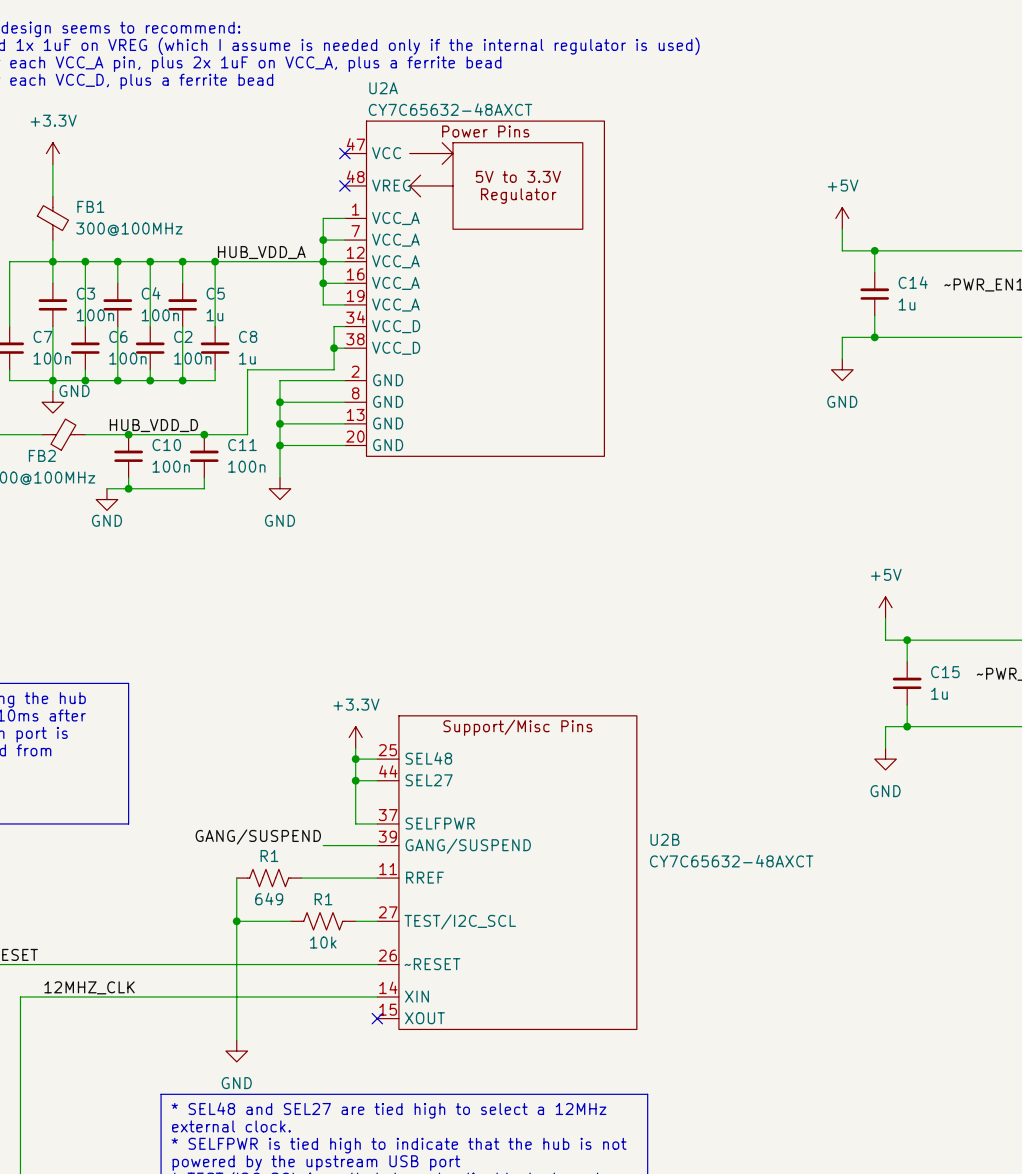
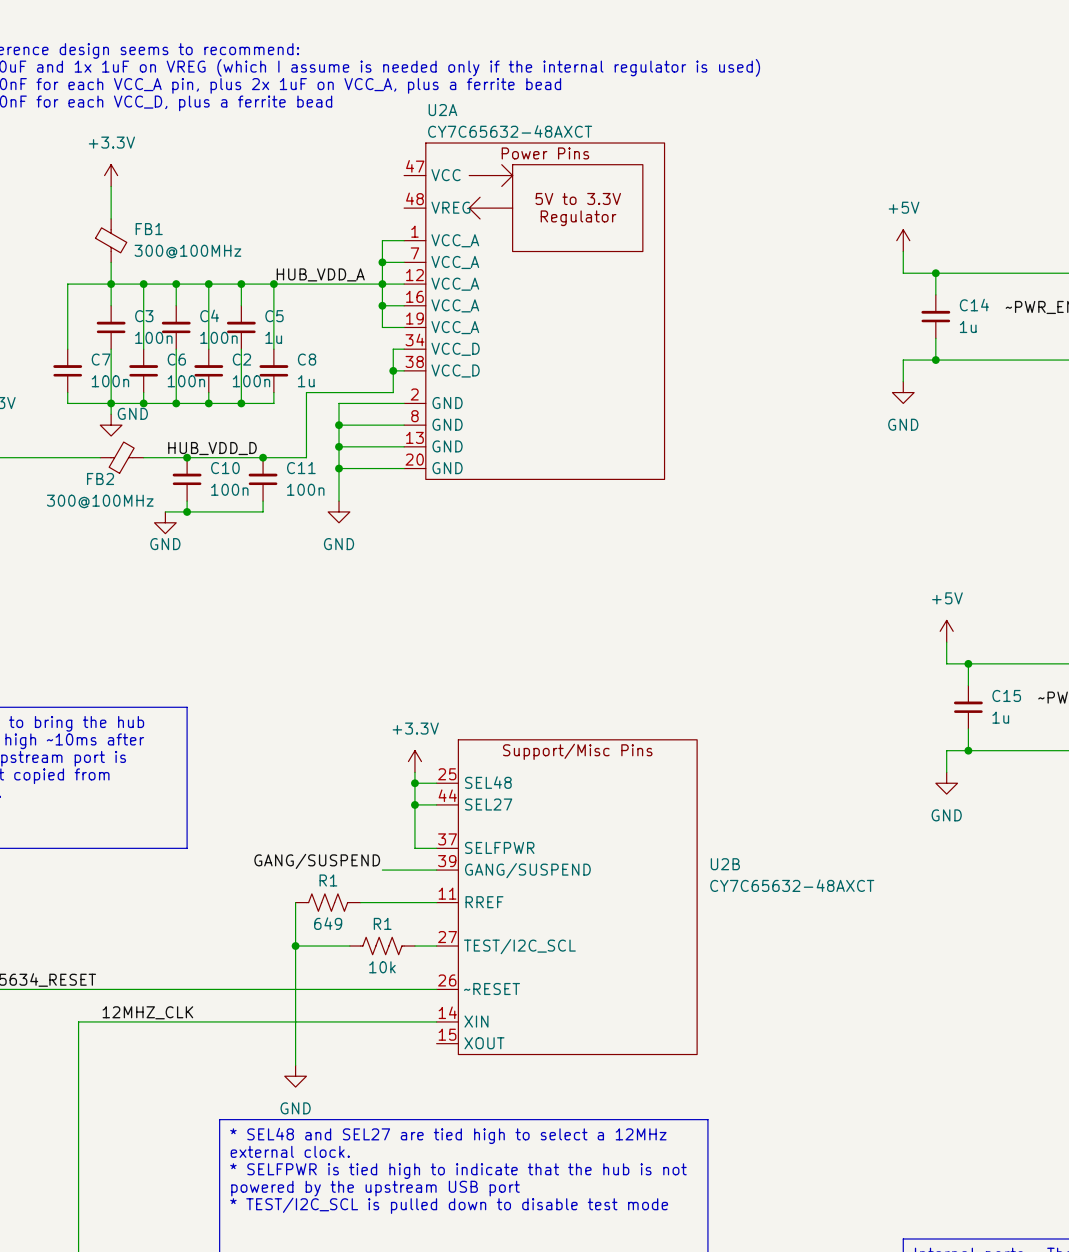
no-connect mark: (344, 153) -> none
no-connect mark: (344, 185) -> none
no-connect mark: (377, 1018) -> none

